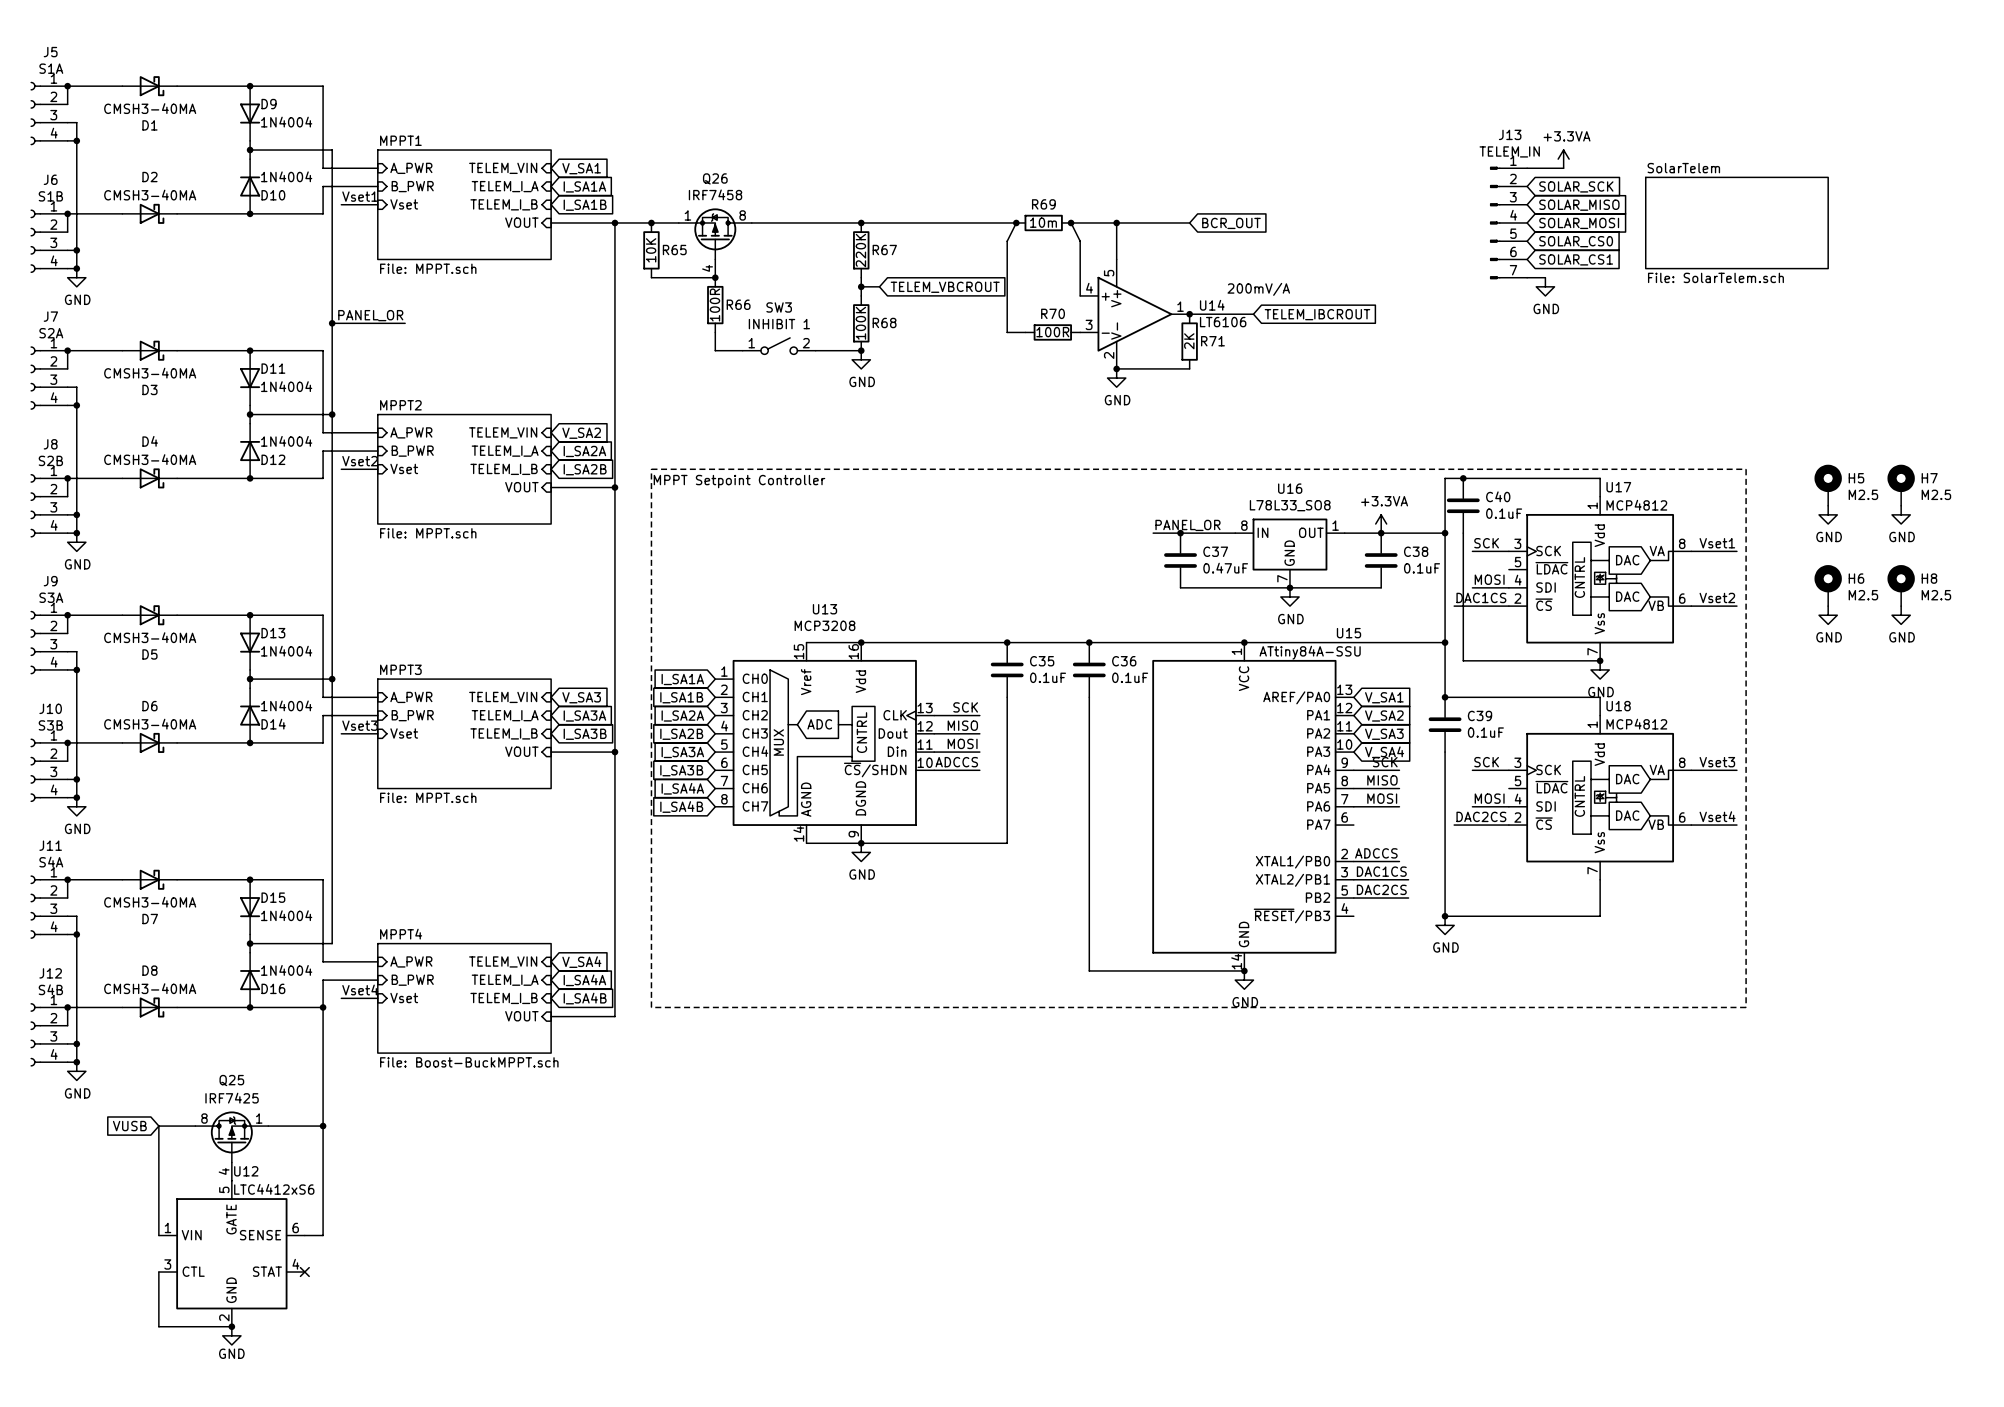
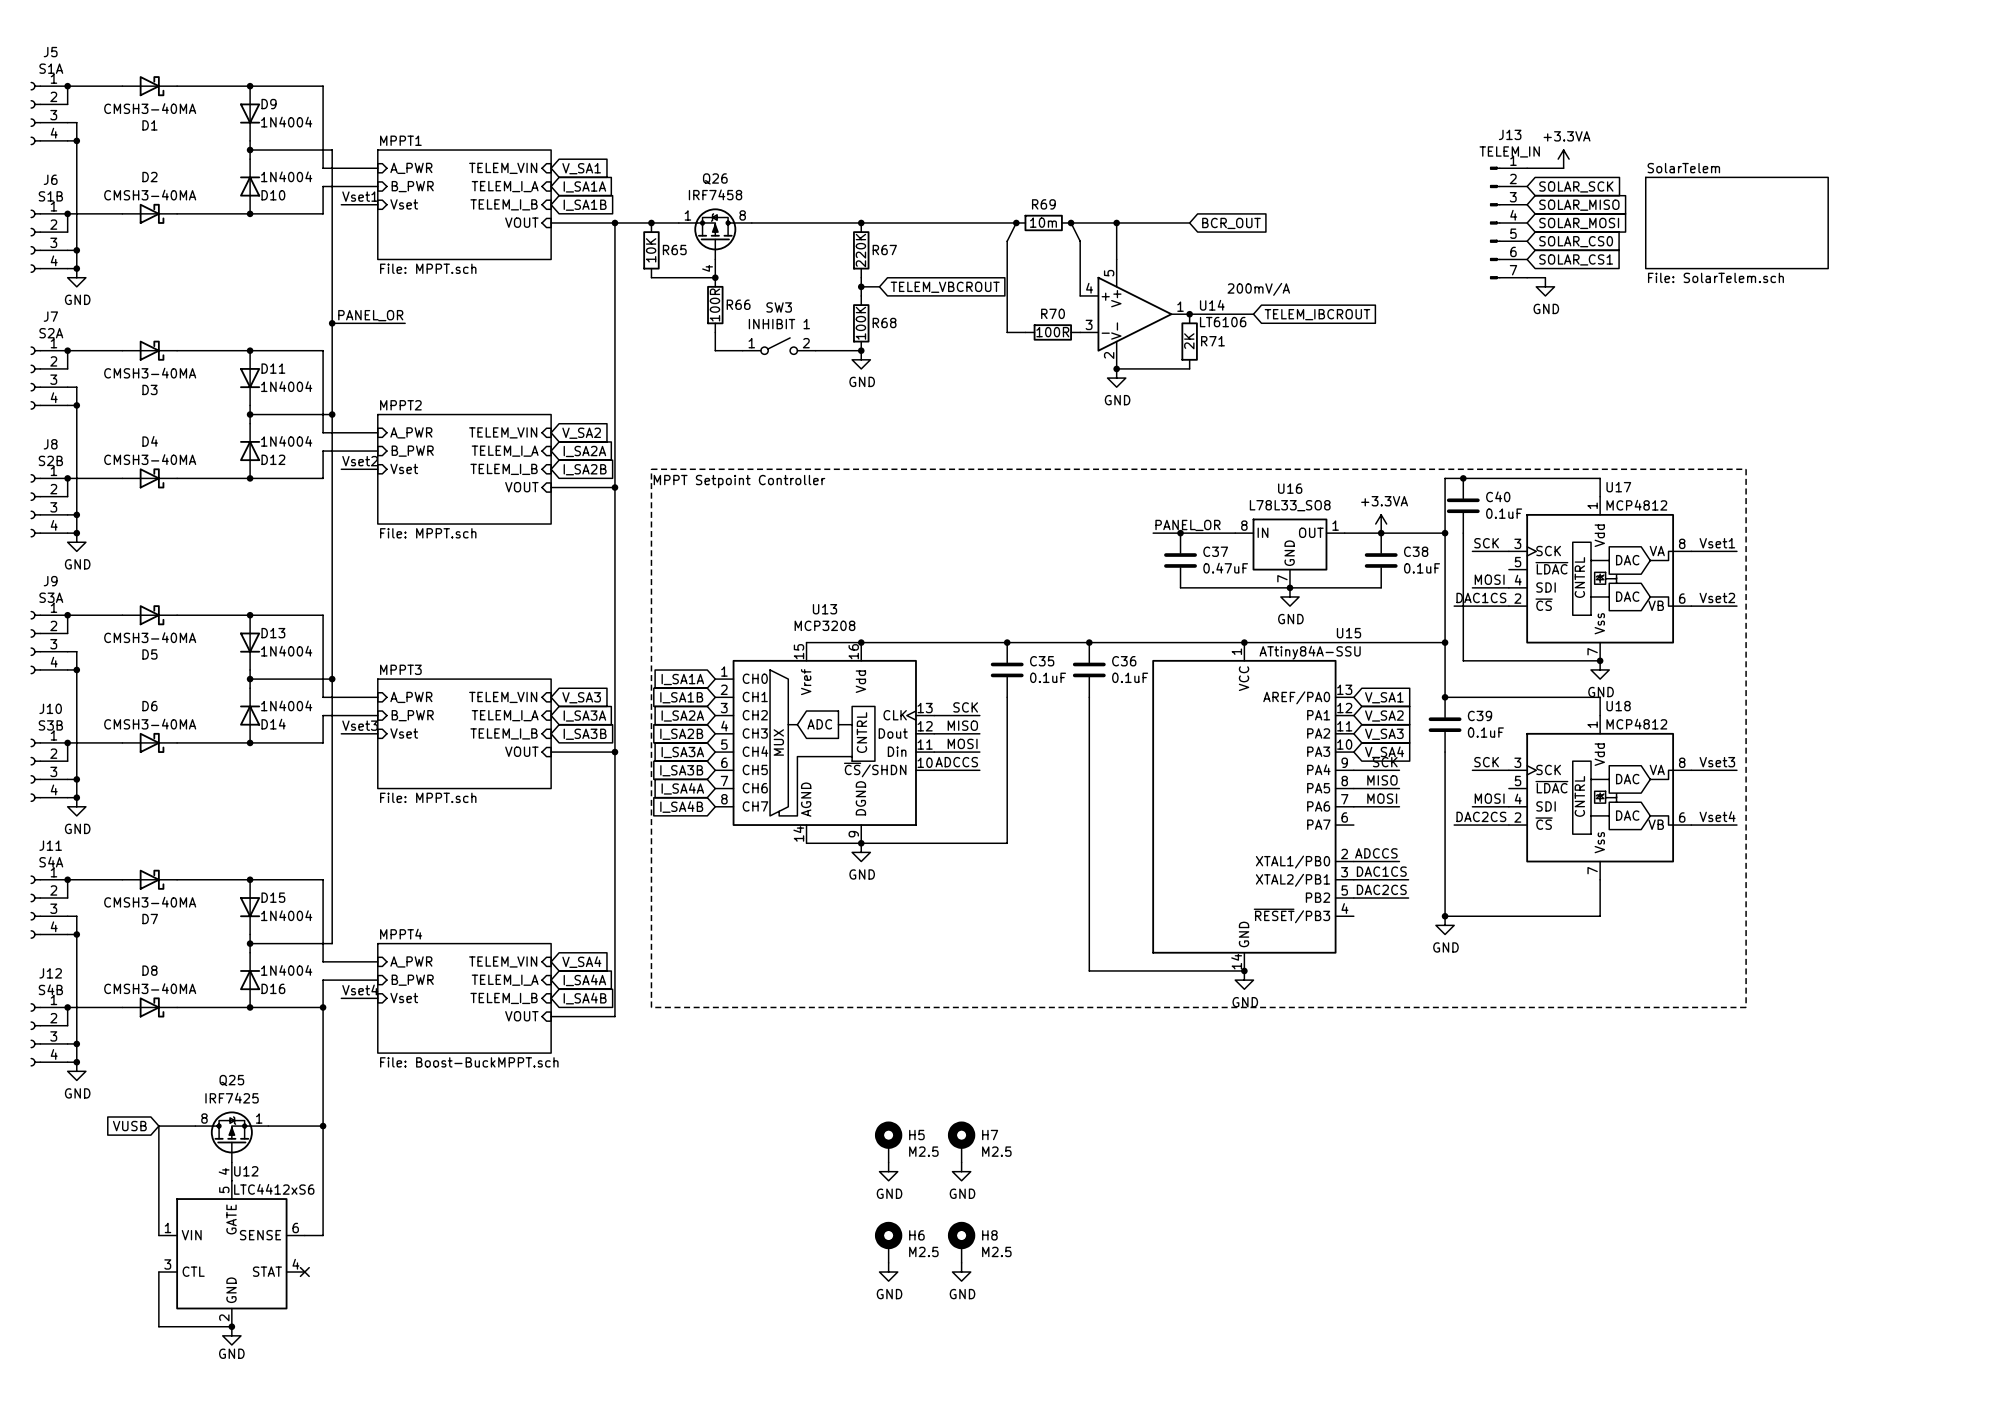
H5 position: (1828, 485) -> (888, 1142)
H7 position: (1901, 485) -> (961, 1142)
power symbol: GND (1828, 514) -> none
power symbol: GND (1901, 514) -> none
H6 position: (1828, 585) -> (888, 1242)
H8 position: (1901, 585) -> (961, 1242)
power symbol: GND (1828, 615) -> none
power symbol: GND (1901, 615) -> none
power symbol: none -> GND (888, 1171)
power symbol: none -> GND (961, 1171)
power symbol: none -> GND (888, 1272)
power symbol: none -> GND (961, 1272)

